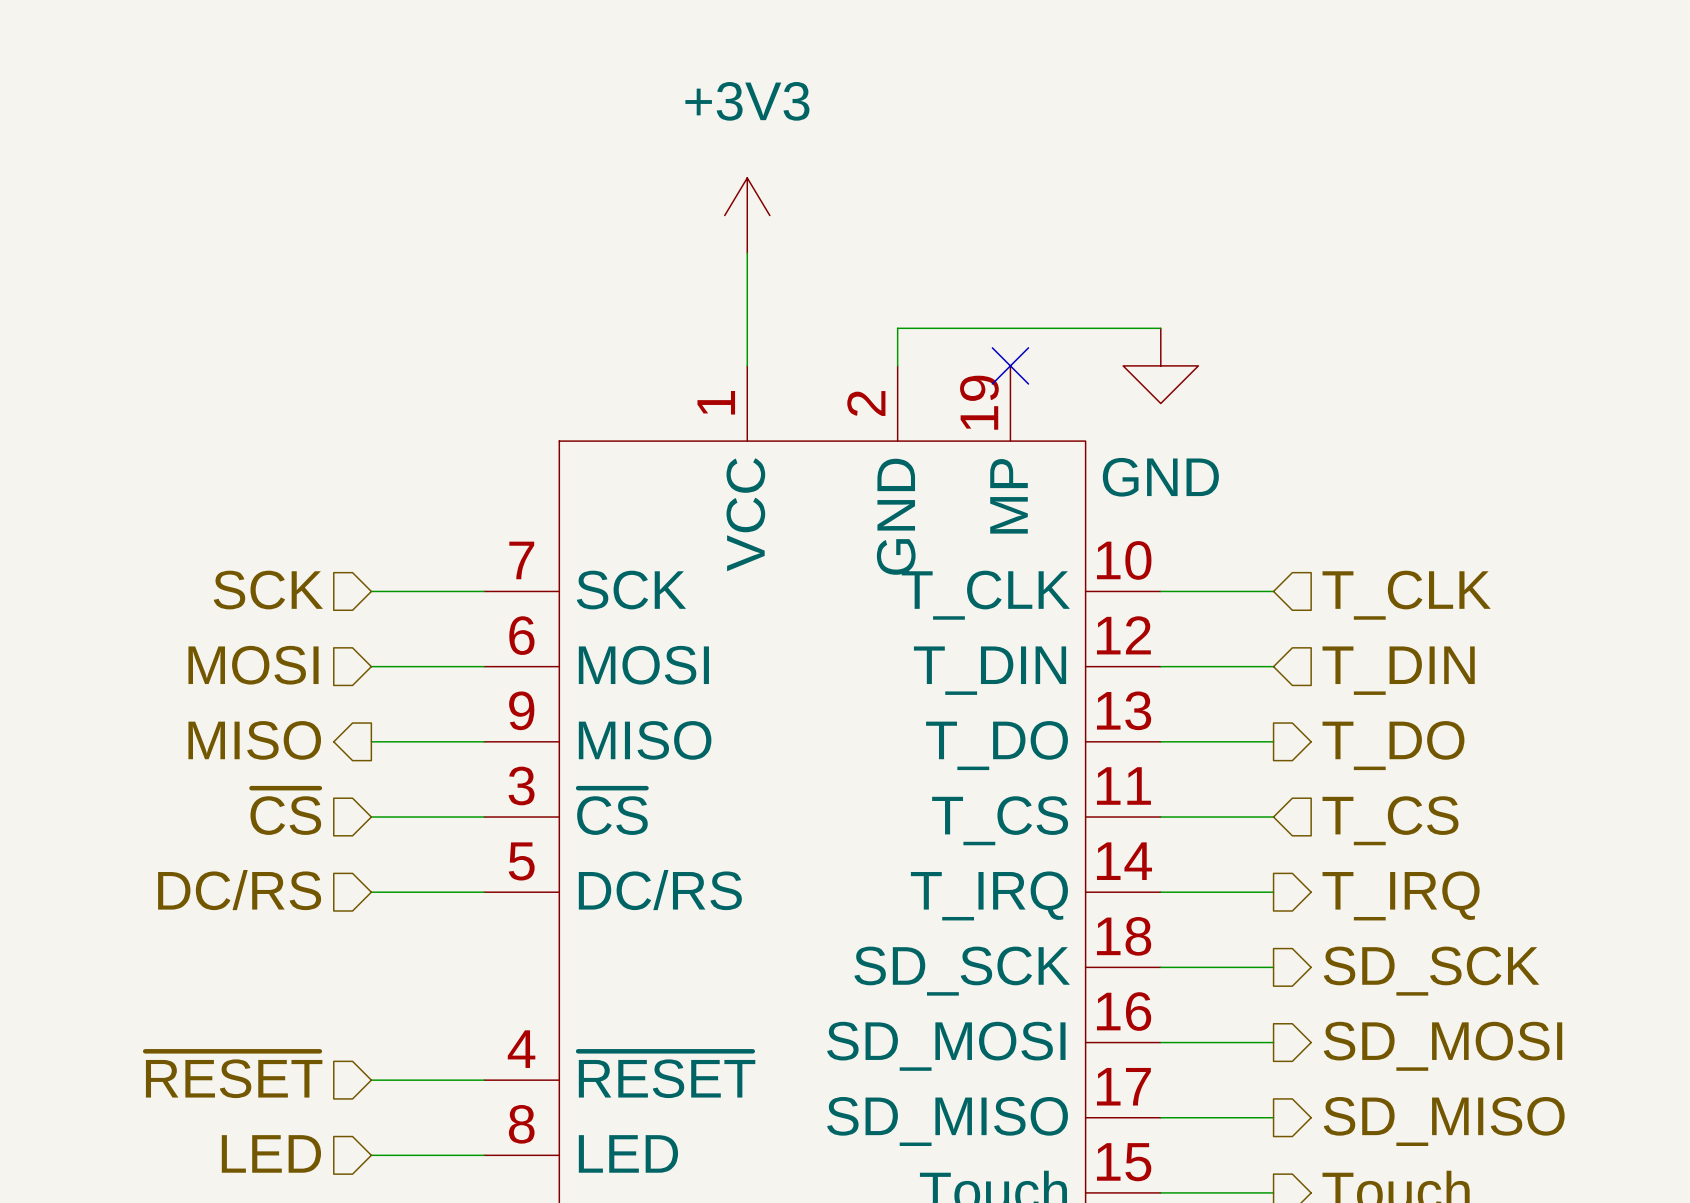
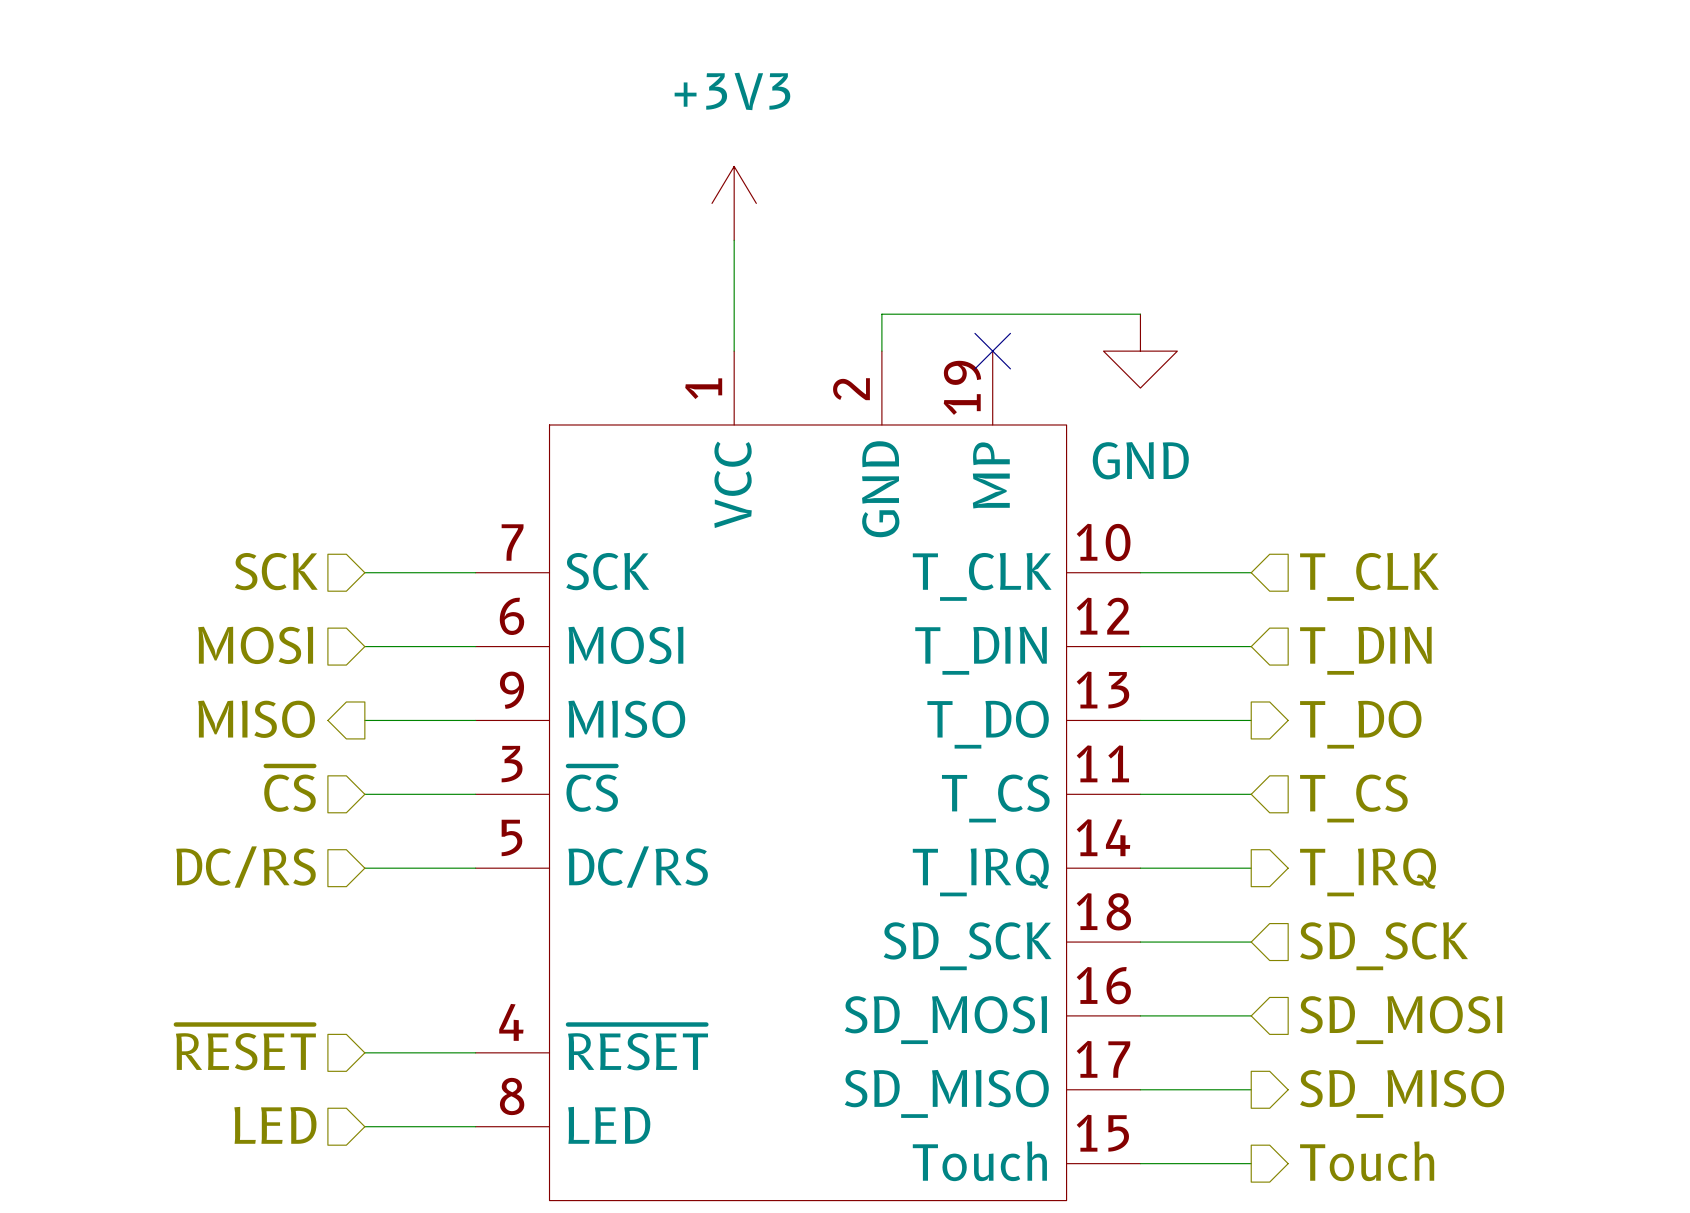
hierarchical label shape: output (1431, 971) -> input (1384, 946)
hierarchical label shape: output (1443, 1046) -> input (1401, 1020)

